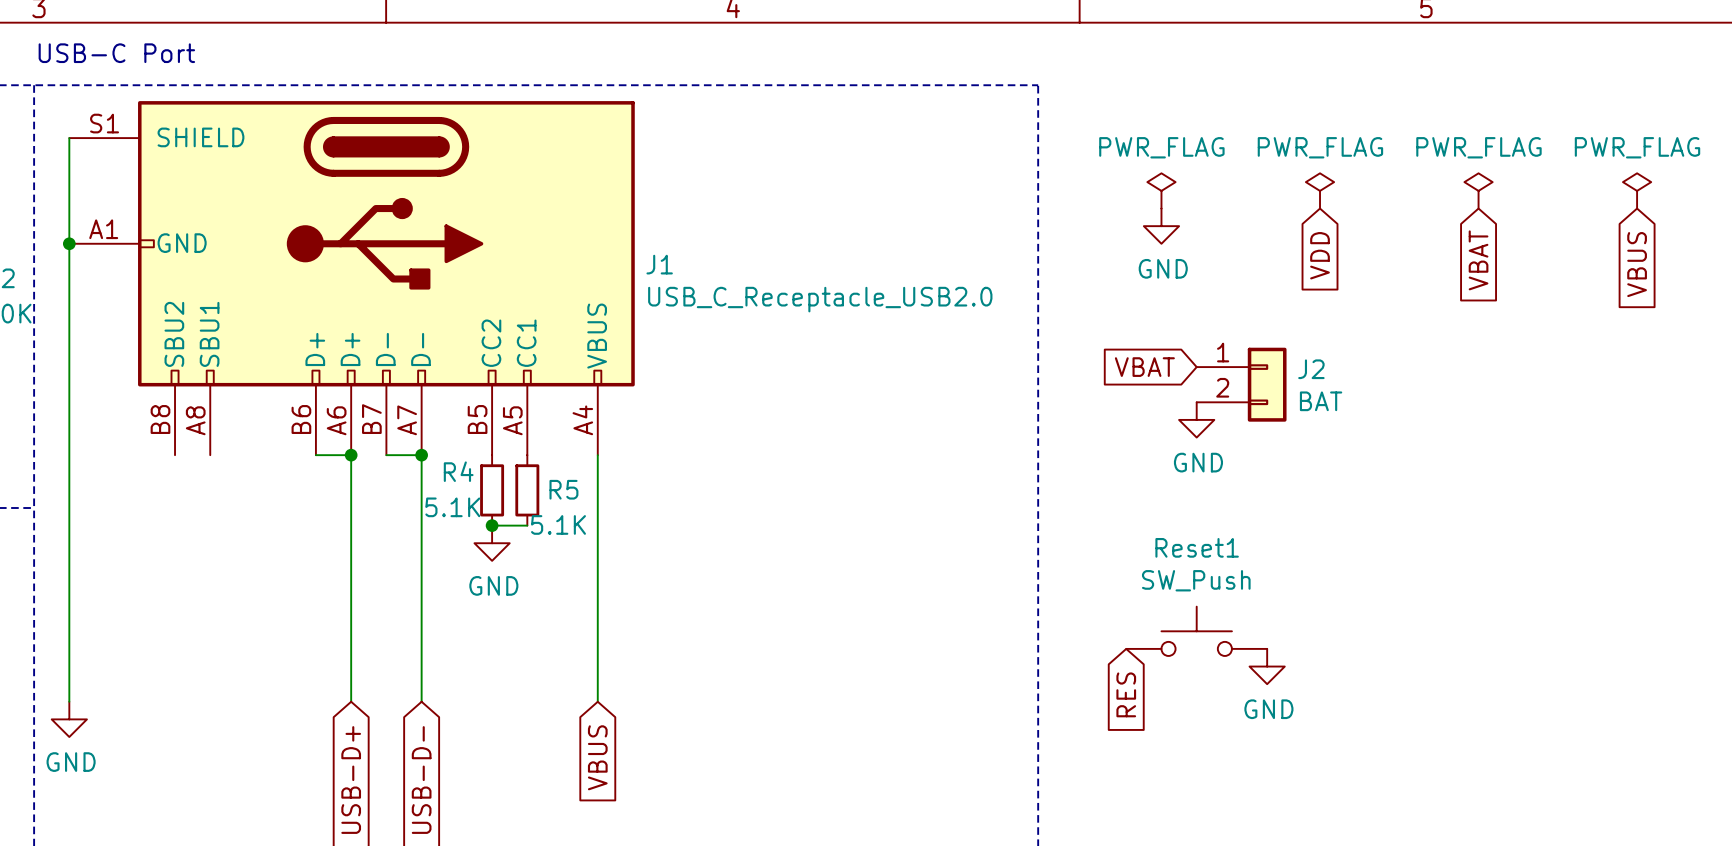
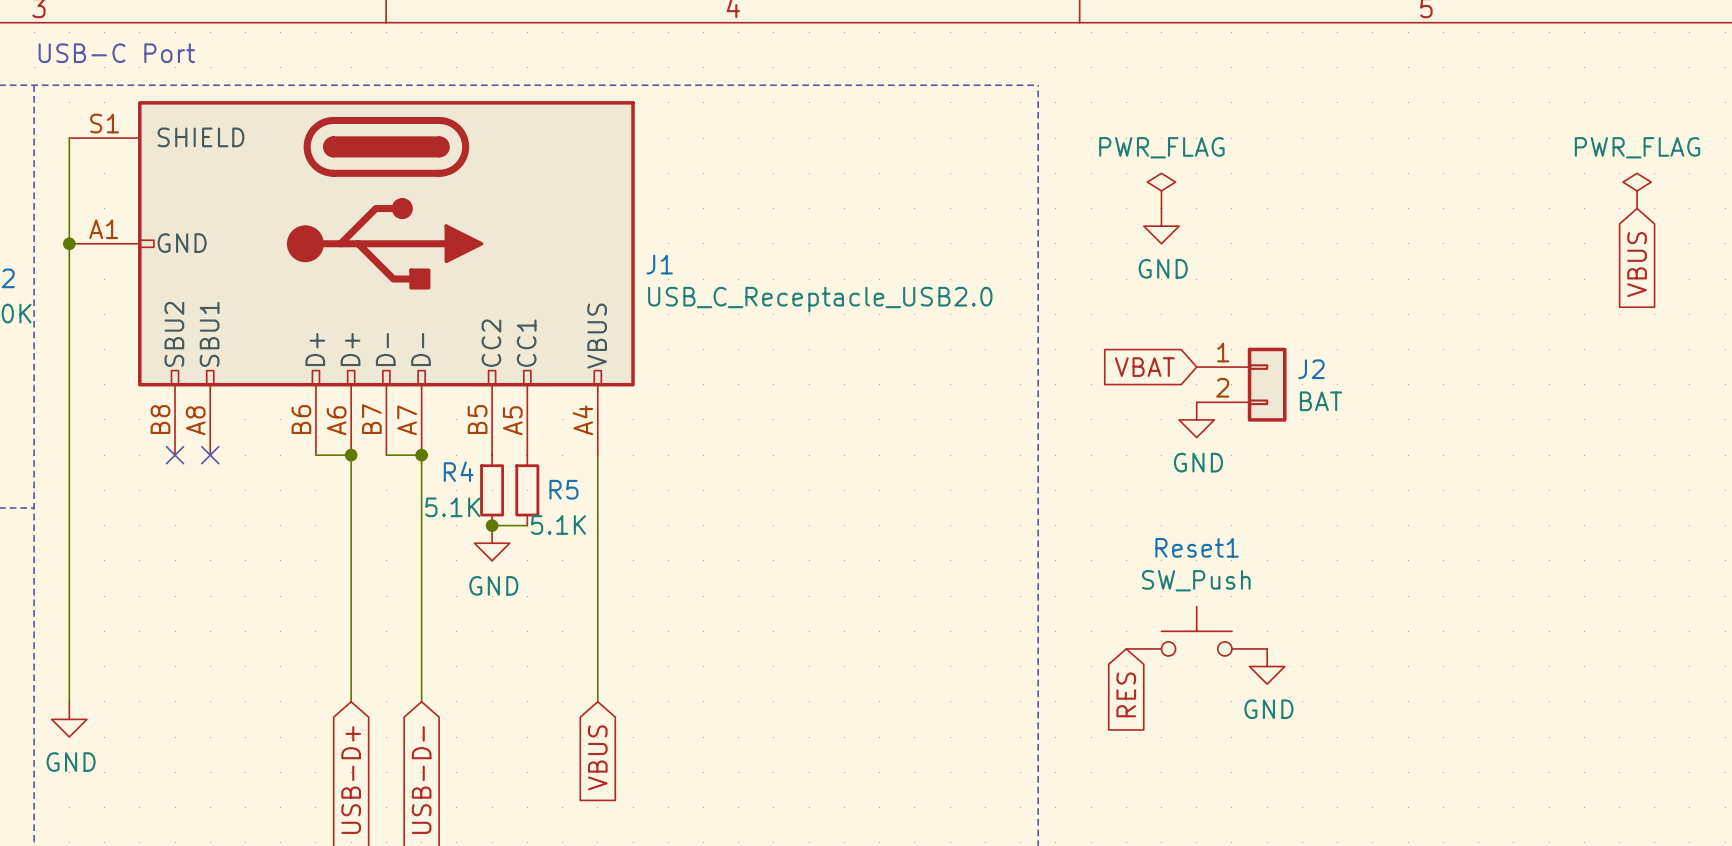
power symbol: PWR_FLAG (1320, 190) -> none
power symbol: PWR_FLAG (1478, 190) -> none
global label: VDD (1320, 255) -> none
global label: VBAT (1478, 260) -> none
no-connect mark: none -> (175, 455)
no-connect mark: none -> (210, 455)

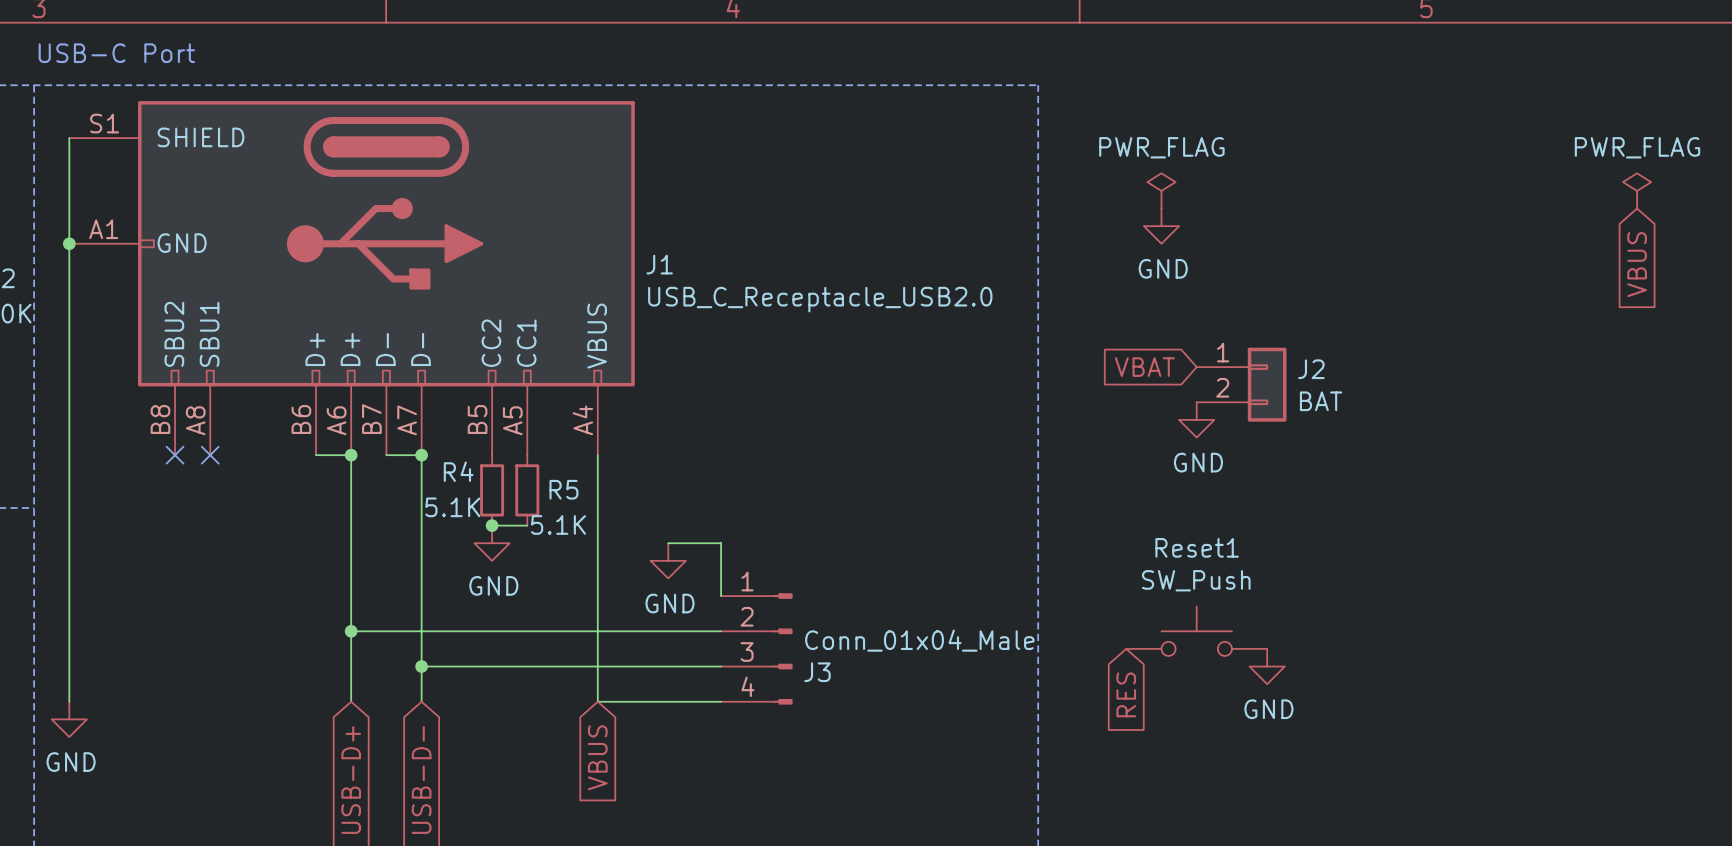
wire: none -> (668, 543) (721, 543) (721, 596)
power symbol: none -> GND (668, 560)
wire: none -> (351, 631) (721, 631)
junction: none -> (351, 631)
J3: none -> Conn_01x04_Male (756, 648)
wire: none -> (421, 666) (721, 666)
junction: none -> (421, 666)
wire: none -> (597, 701) (721, 701)

